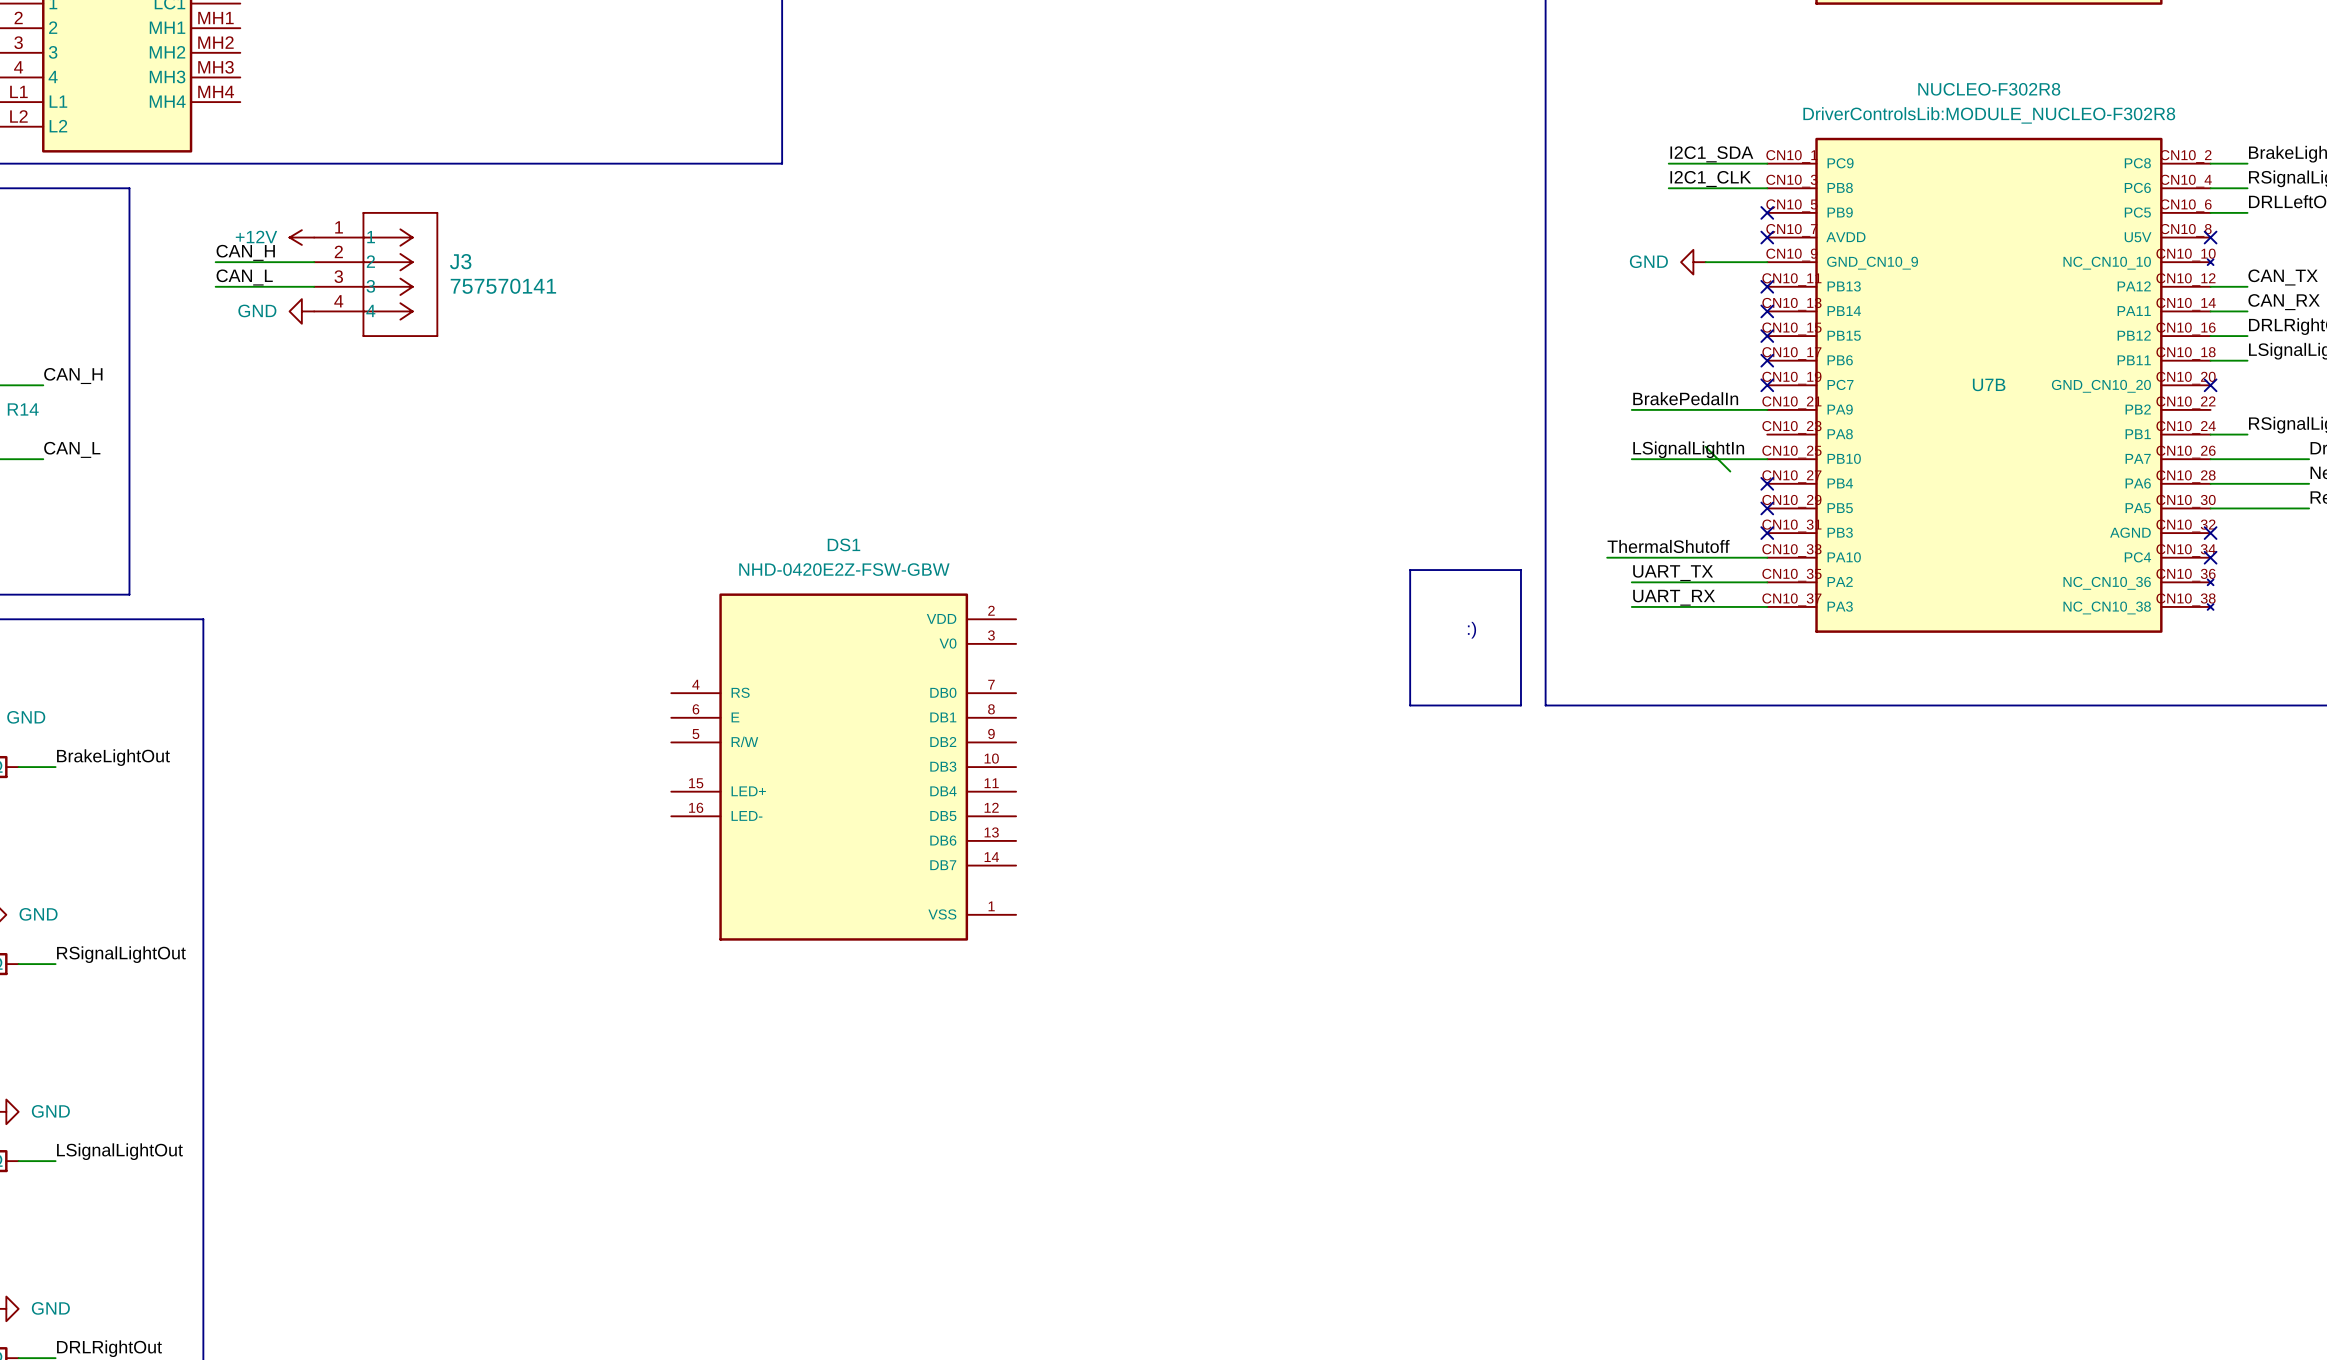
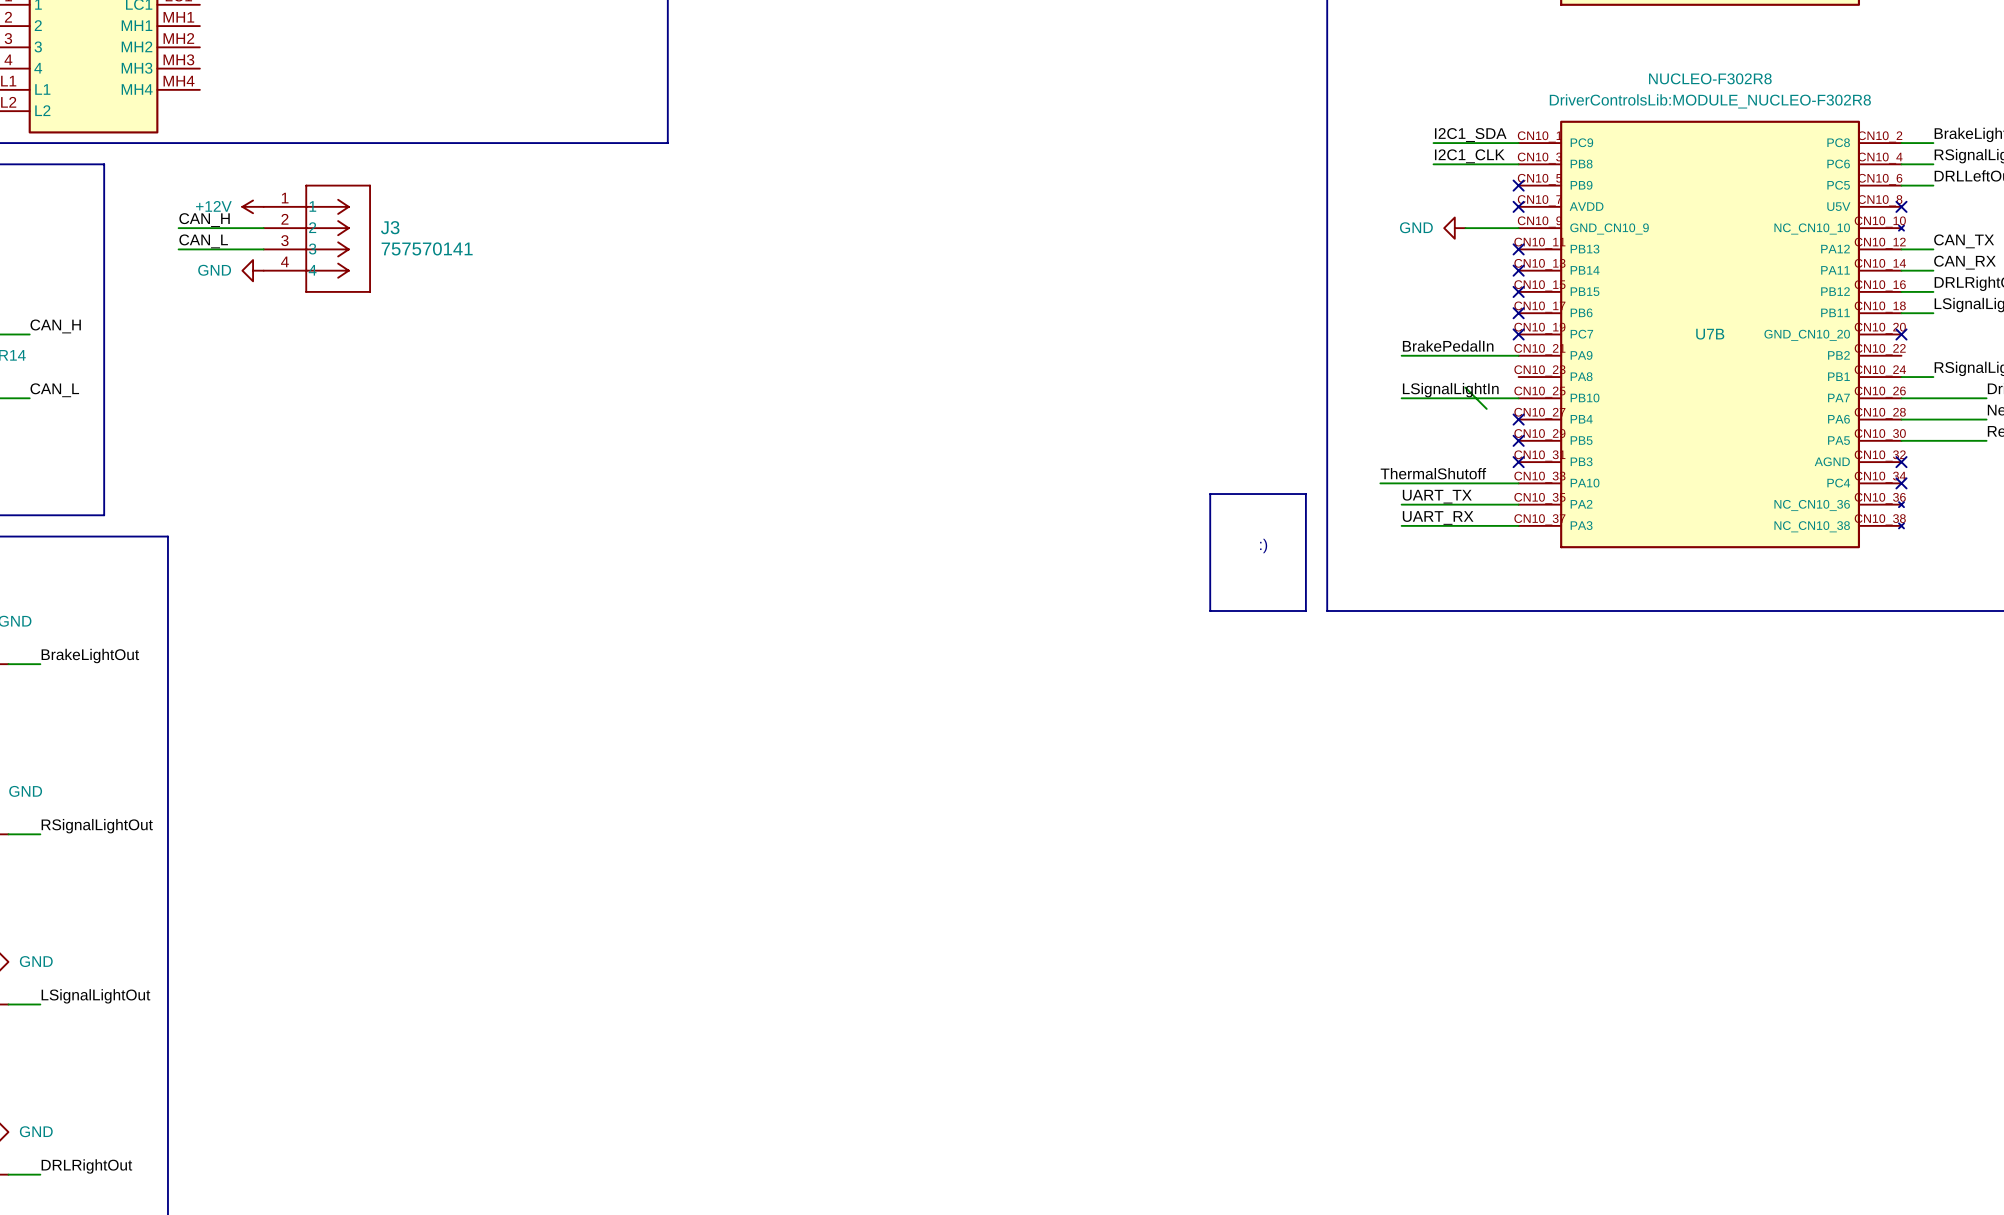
DS1: NHD-0420E2Z-FSW-GBW (843, 767) -> none

